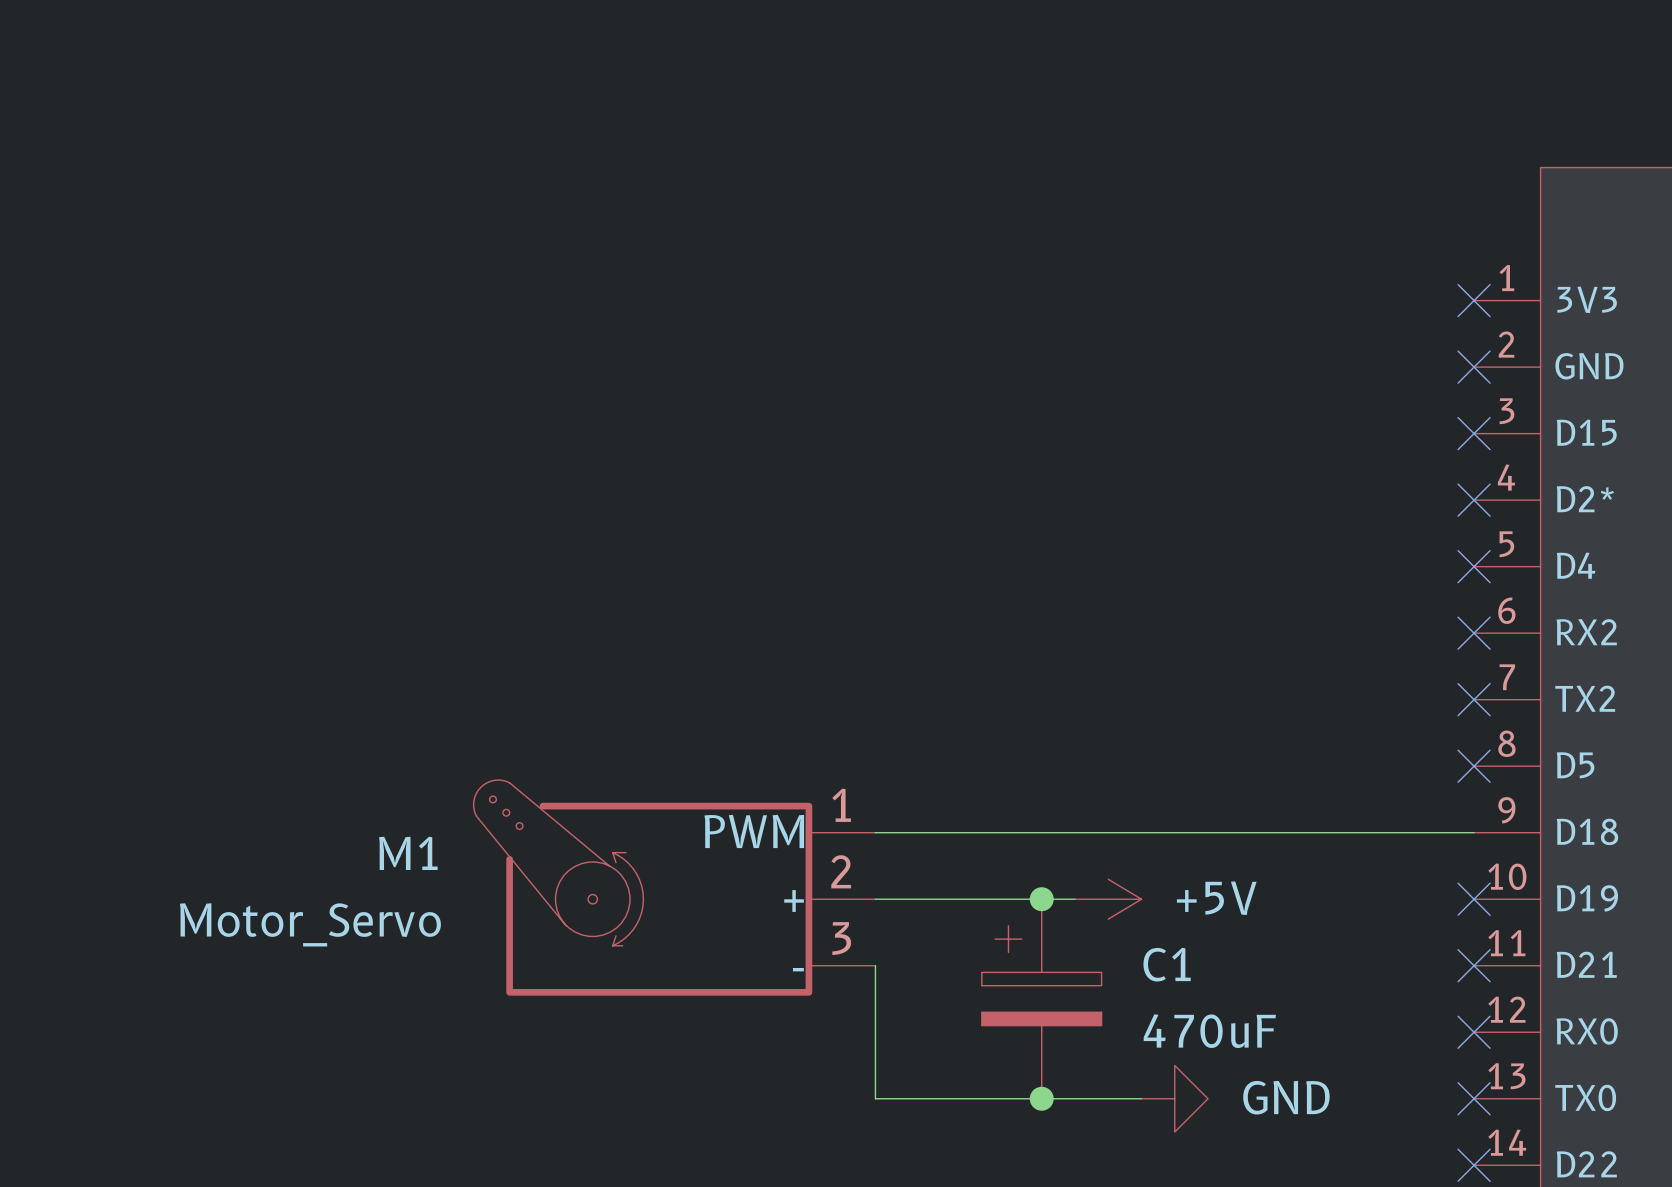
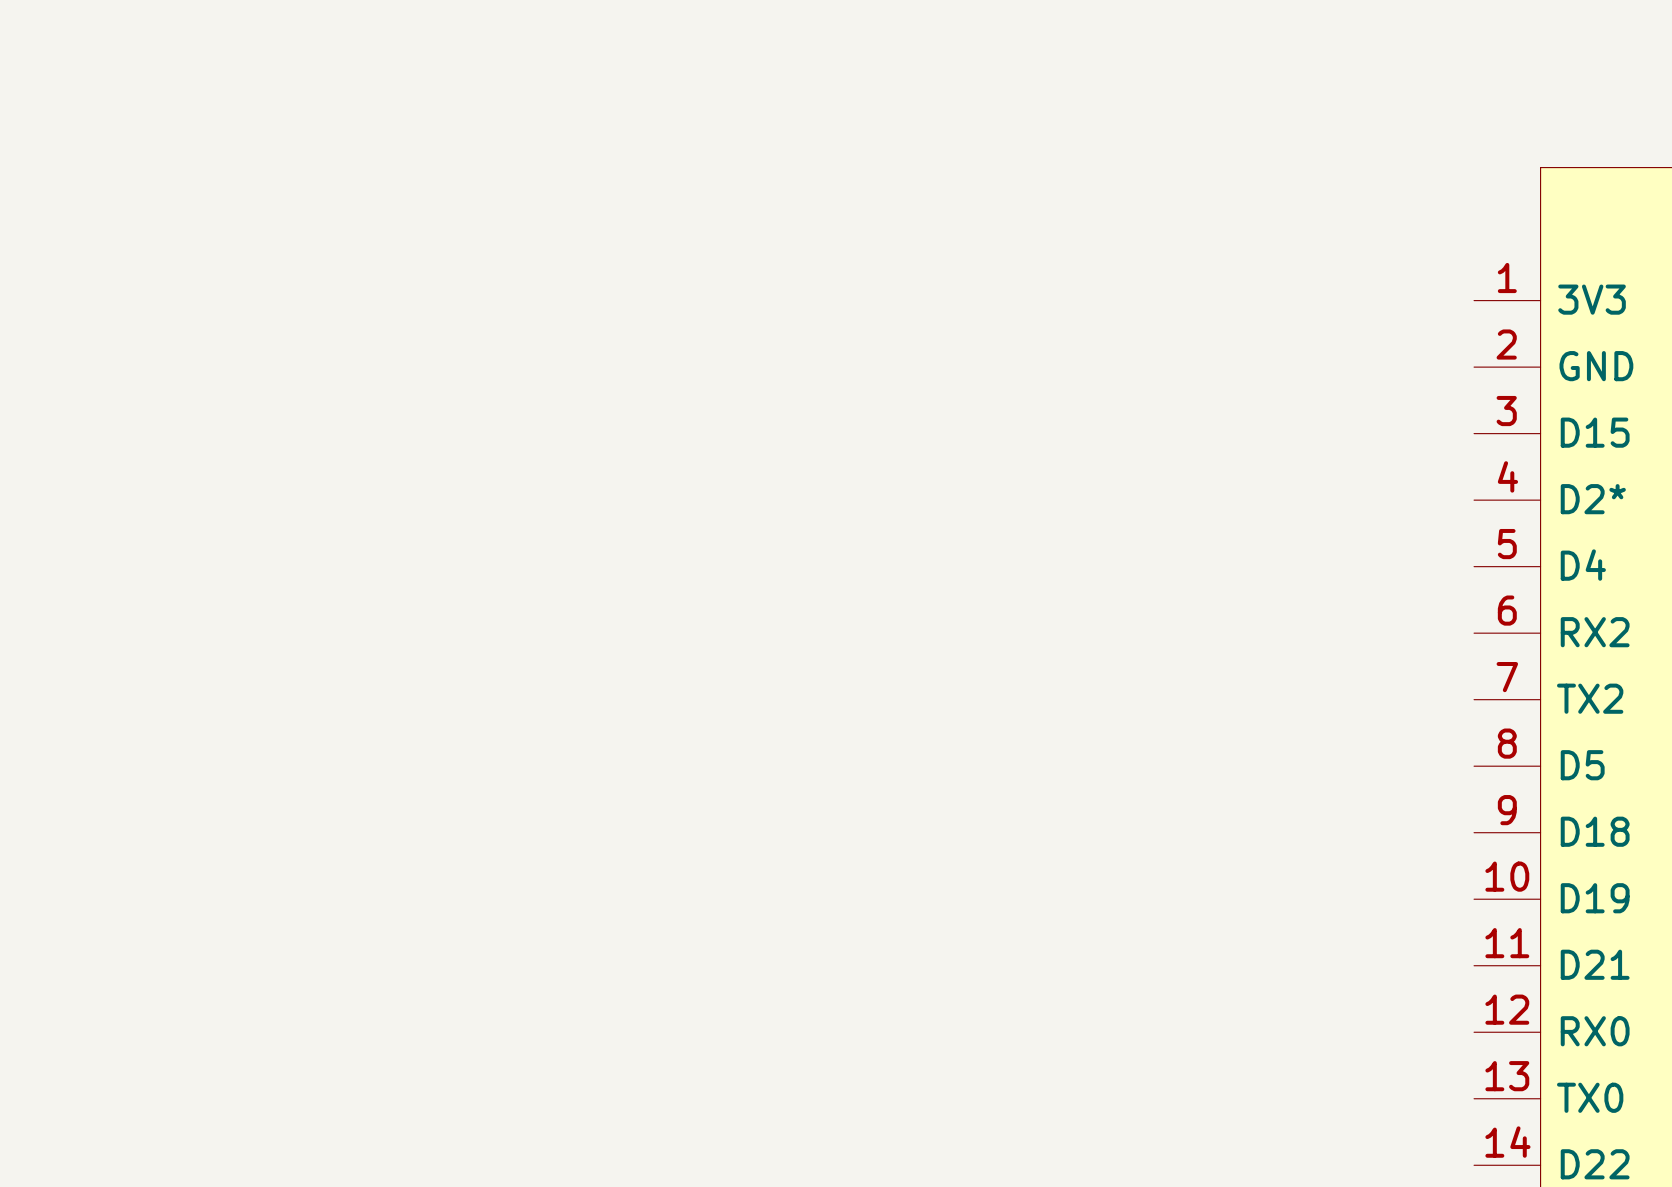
no-connect mark: (1474, 300) -> none
no-connect mark: (1474, 367) -> none
no-connect mark: (1474, 433) -> none
no-connect mark: (1474, 500) -> none
no-connect mark: (1474, 566) -> none
no-connect mark: (1474, 633) -> none
no-connect mark: (1474, 699) -> none
no-connect mark: (1474, 766) -> none
wire: (875, 832) (1474, 832) -> none
M1: Motor_Servo (674, 887) -> none
wire: (875, 899) (1074, 899) -> none
junction: (1041, 899) -> none
power symbol: +5V (1108, 899) -> none
no-connect mark: (1474, 899) -> none
wire: (875, 965) (875, 1098) (1141, 1098) -> none
no-connect mark: (1474, 965) -> none
C1: 470uF (1041, 998) -> none
no-connect mark: (1474, 1032) -> none
junction: (1041, 1098) -> none
power symbol: GND (1174, 1098) -> none
no-connect mark: (1474, 1098) -> none
no-connect mark: (1474, 1165) -> none

